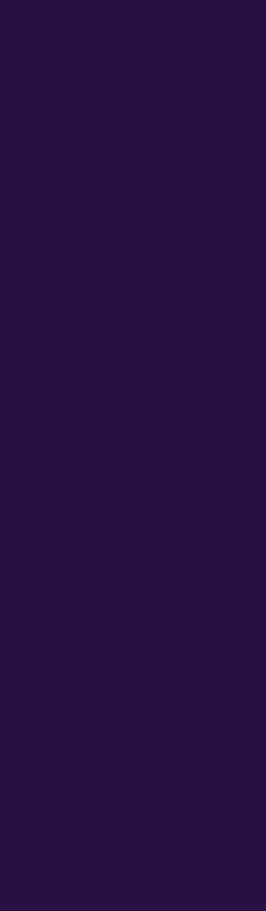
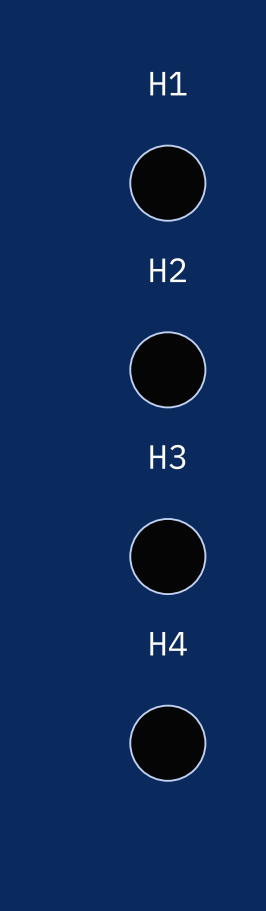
H1: none -> (167, 183)
H2: none -> (167, 369)
H3: none -> (167, 556)
H4: none -> (167, 743)

